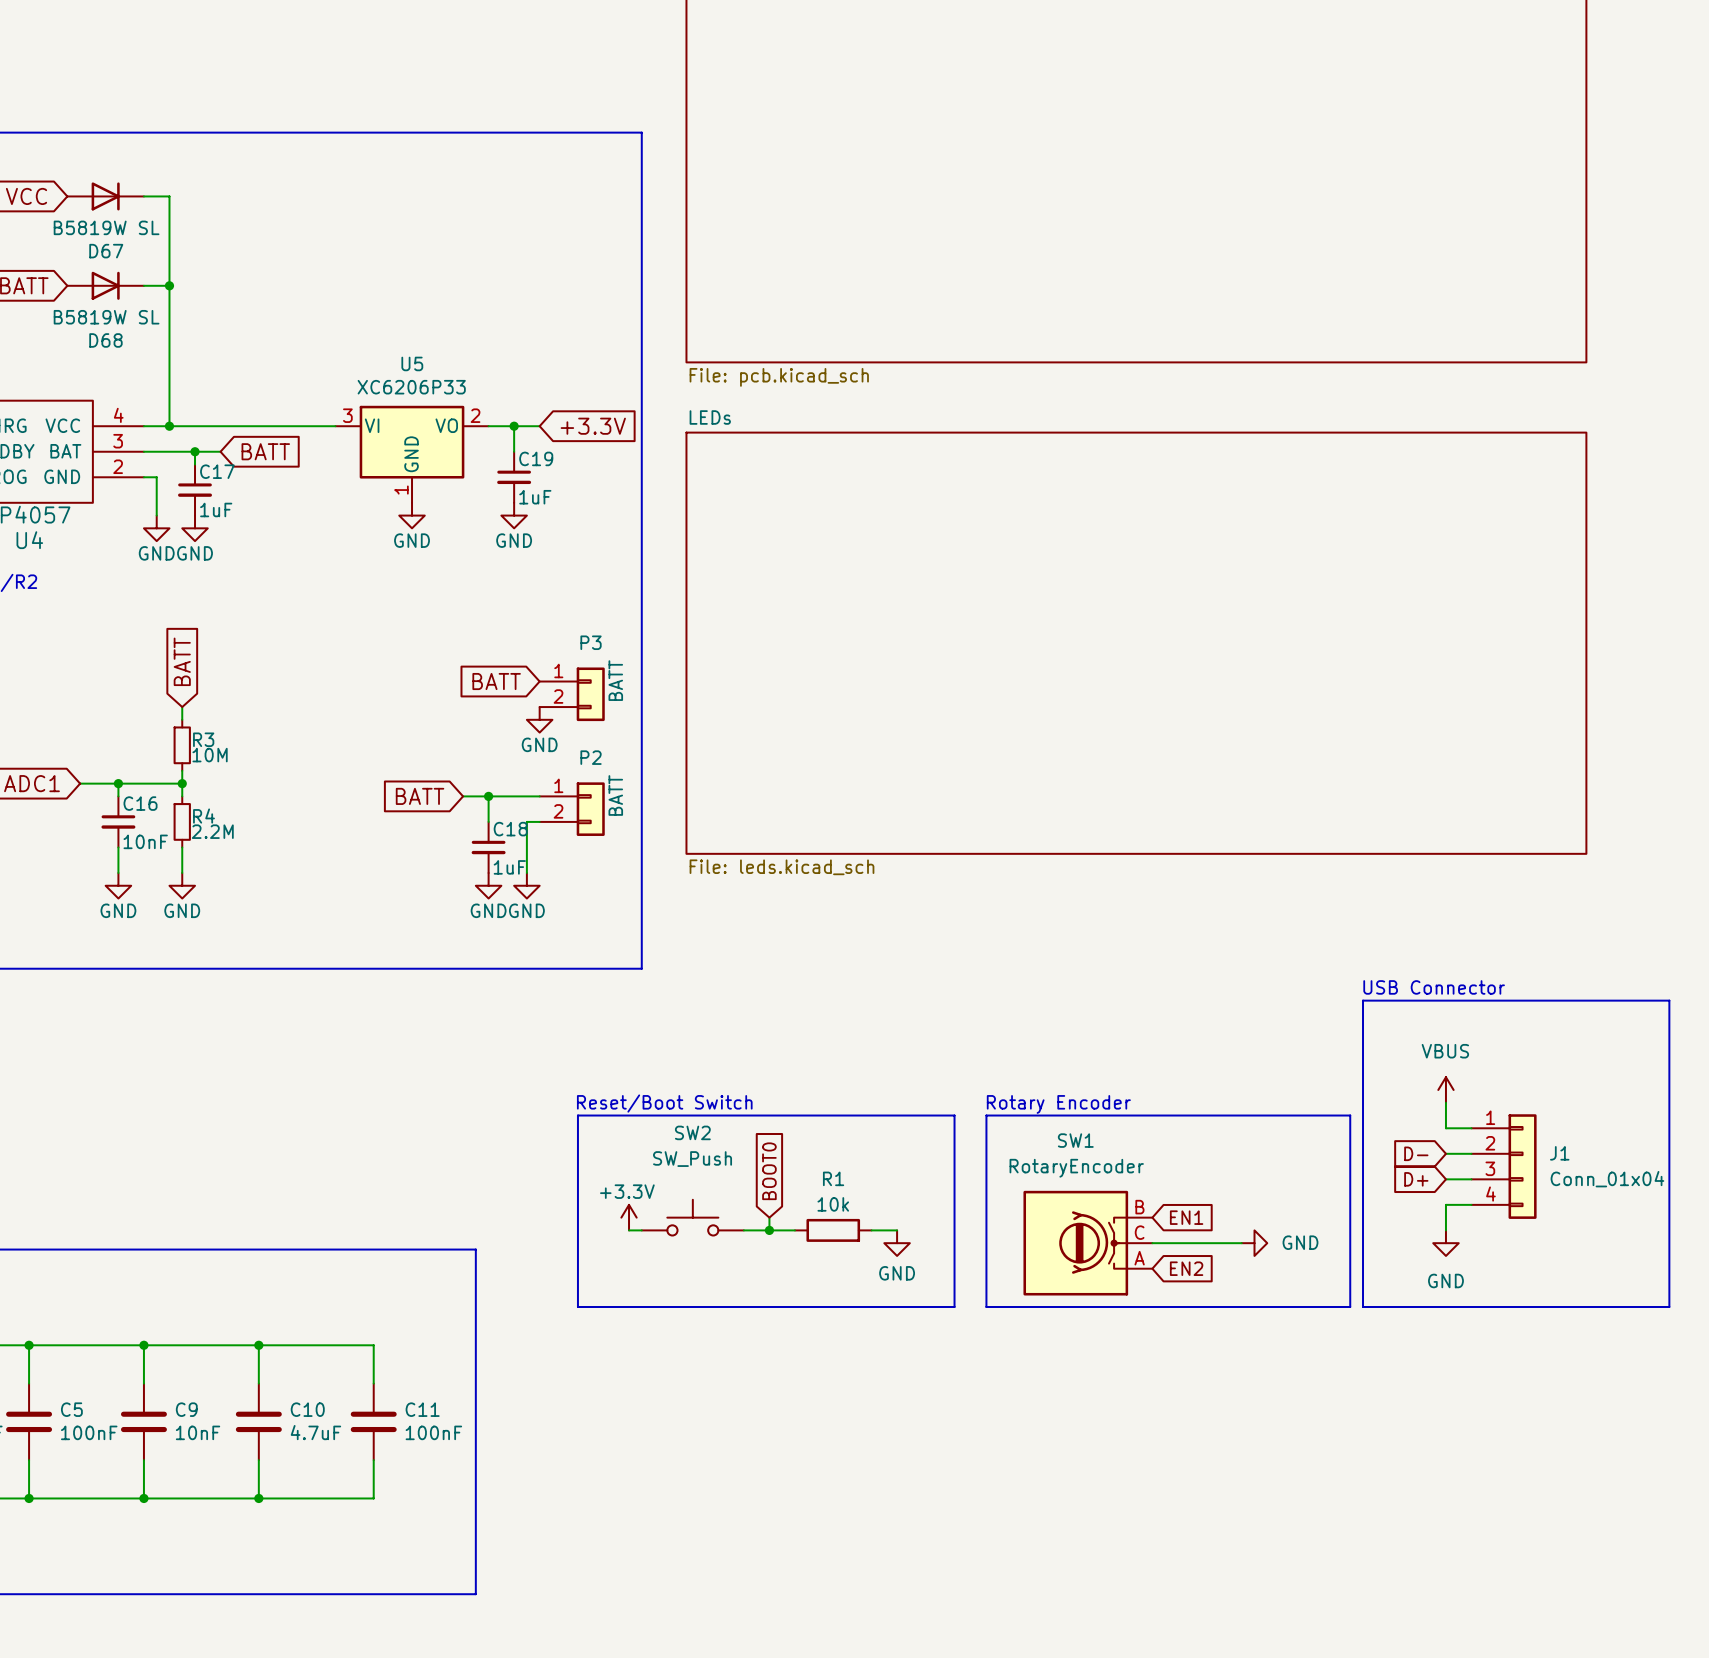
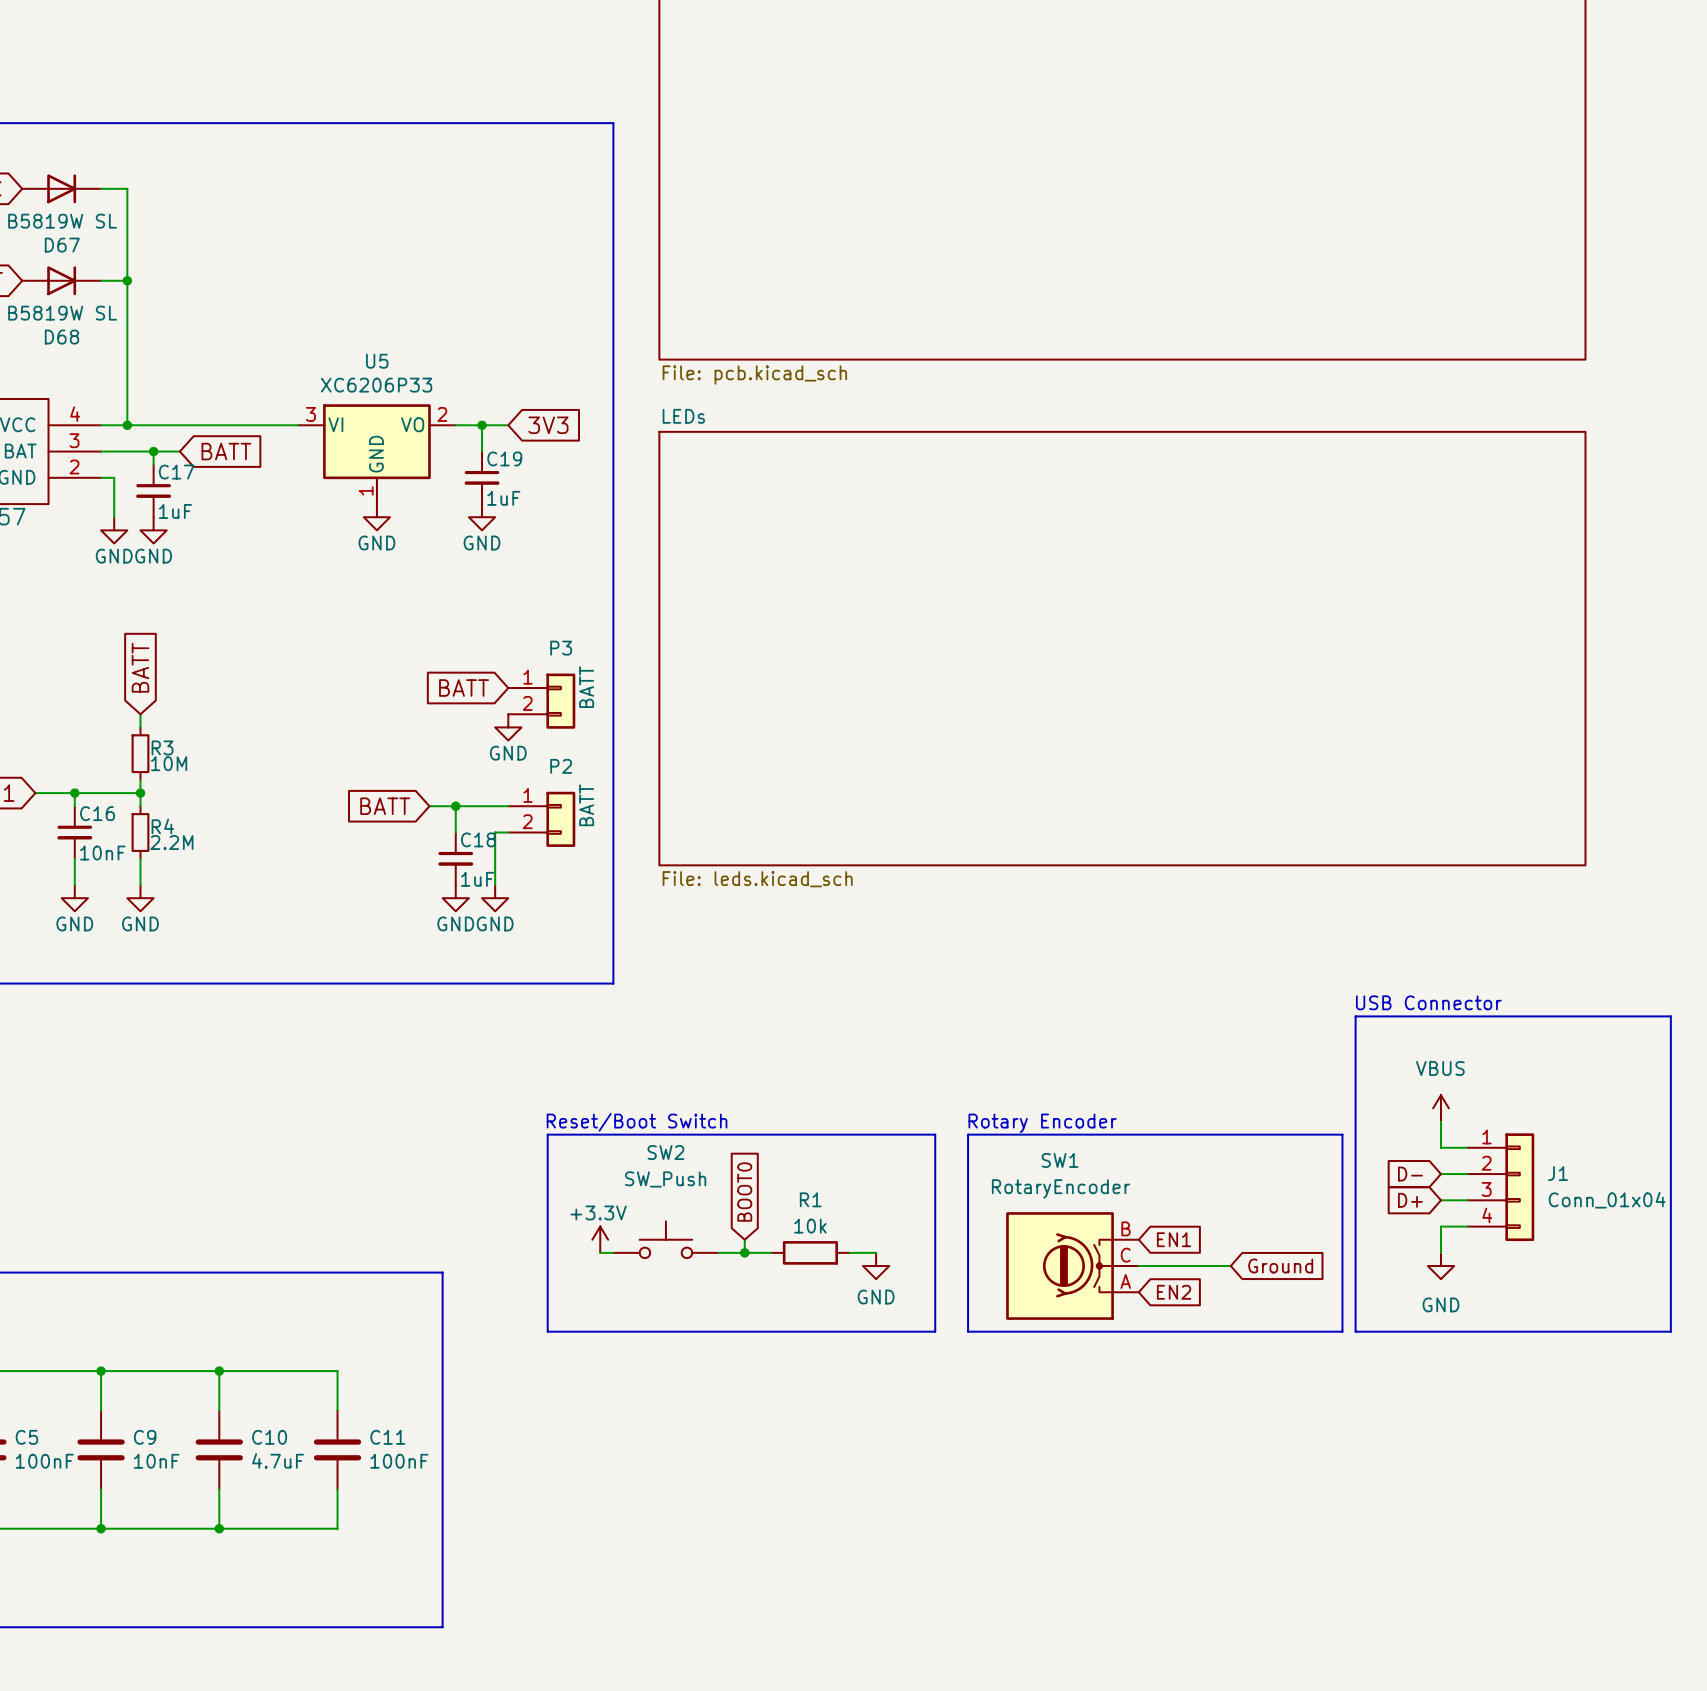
global label: +3.3V (593, 426) -> 3V3 (548, 425)
power symbol: GND (1254, 1243) -> none
global label: none -> Ground (1280, 1266)

